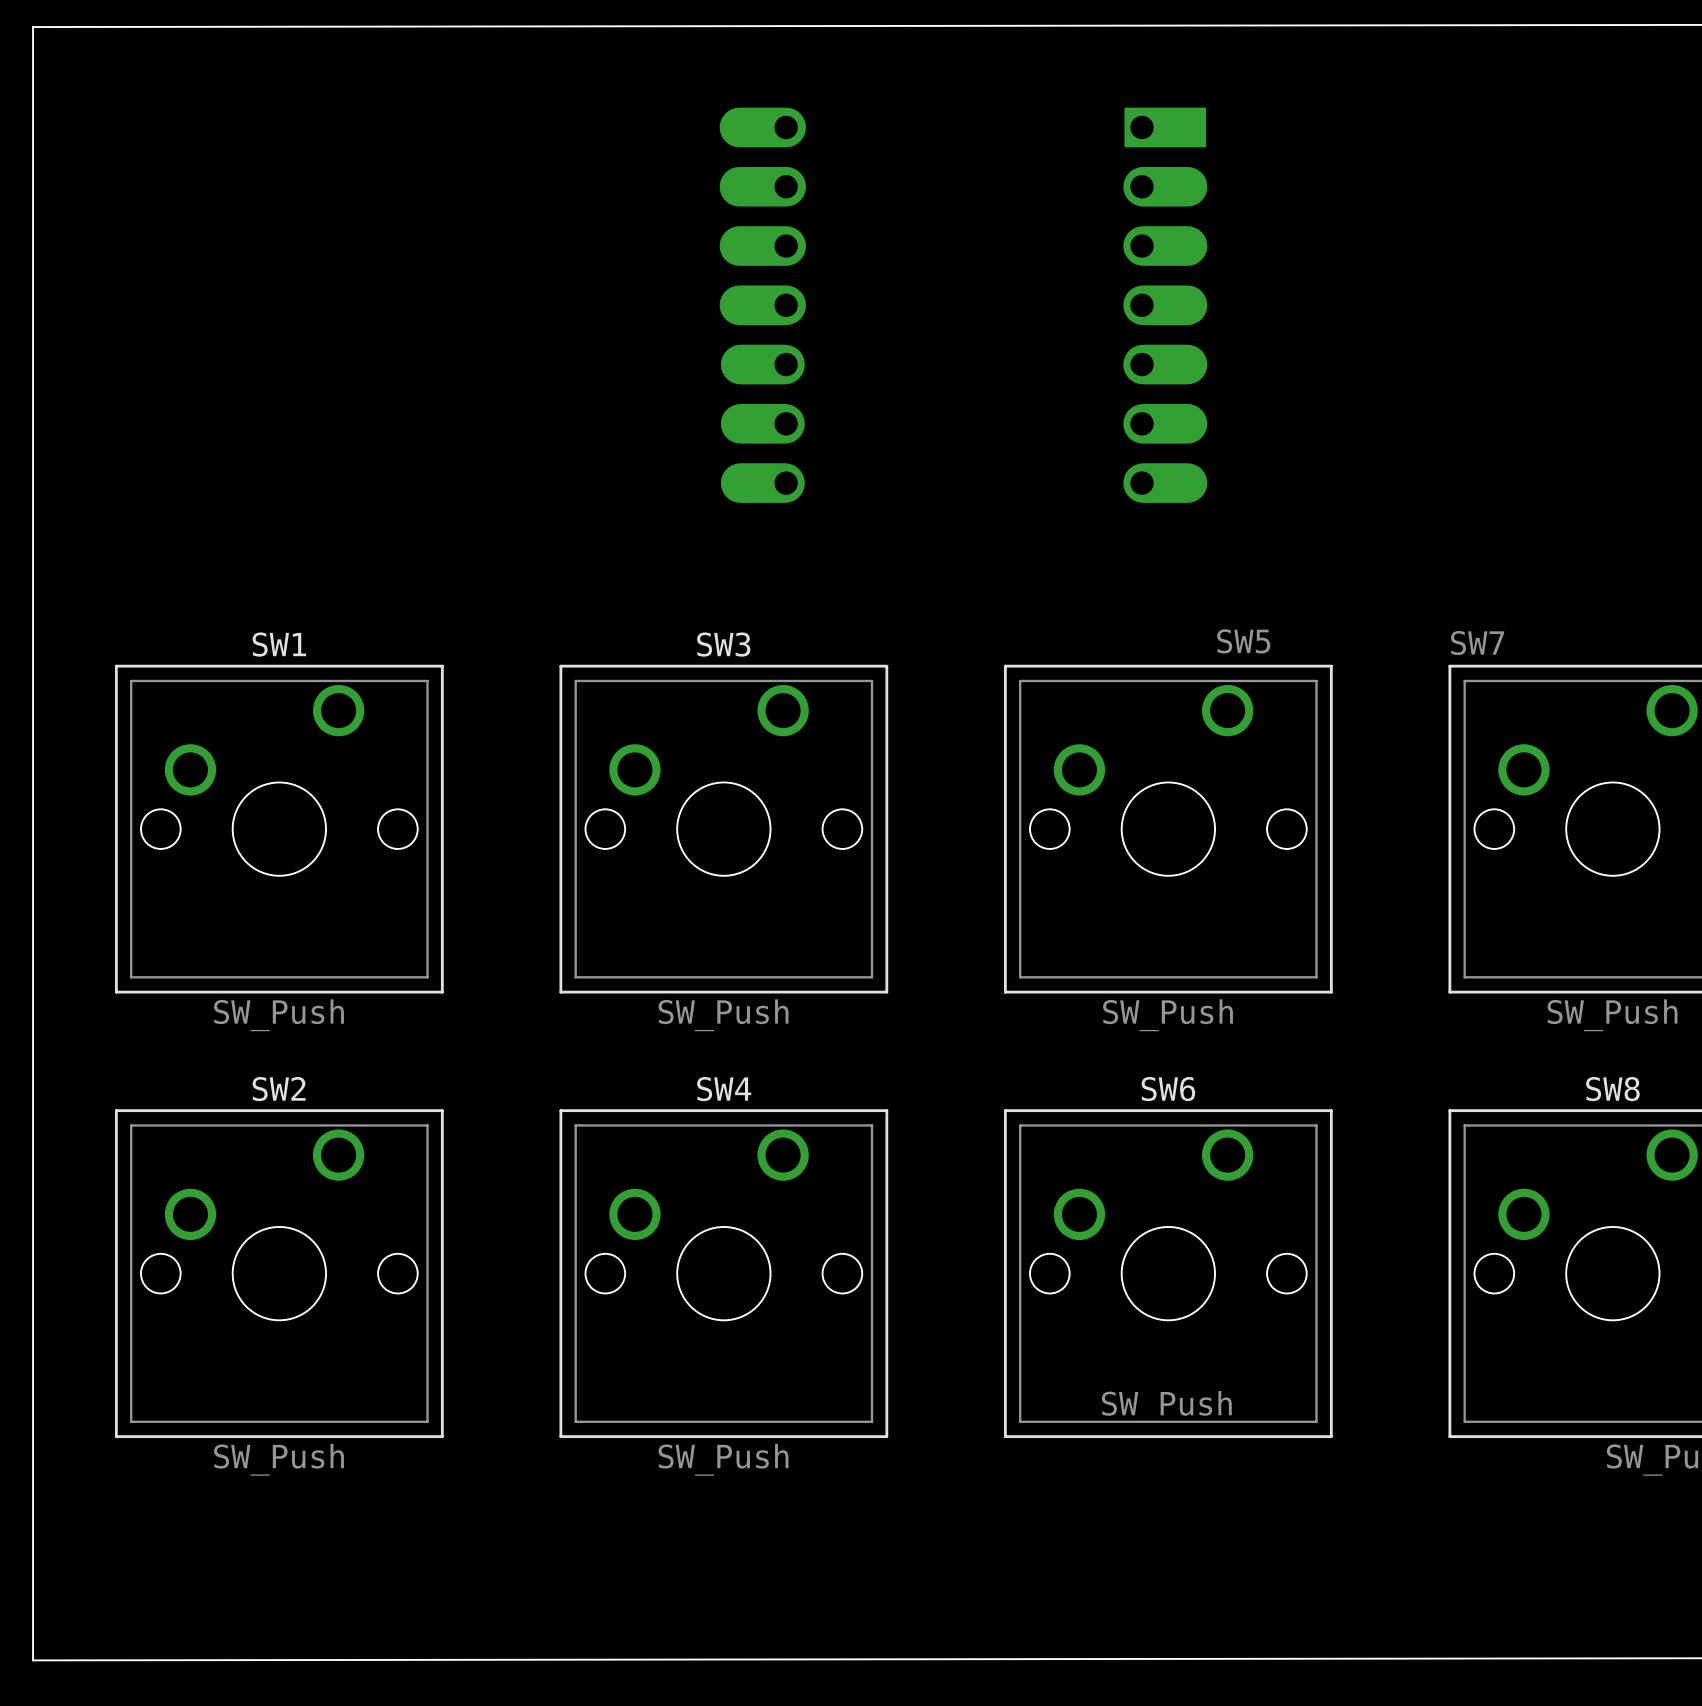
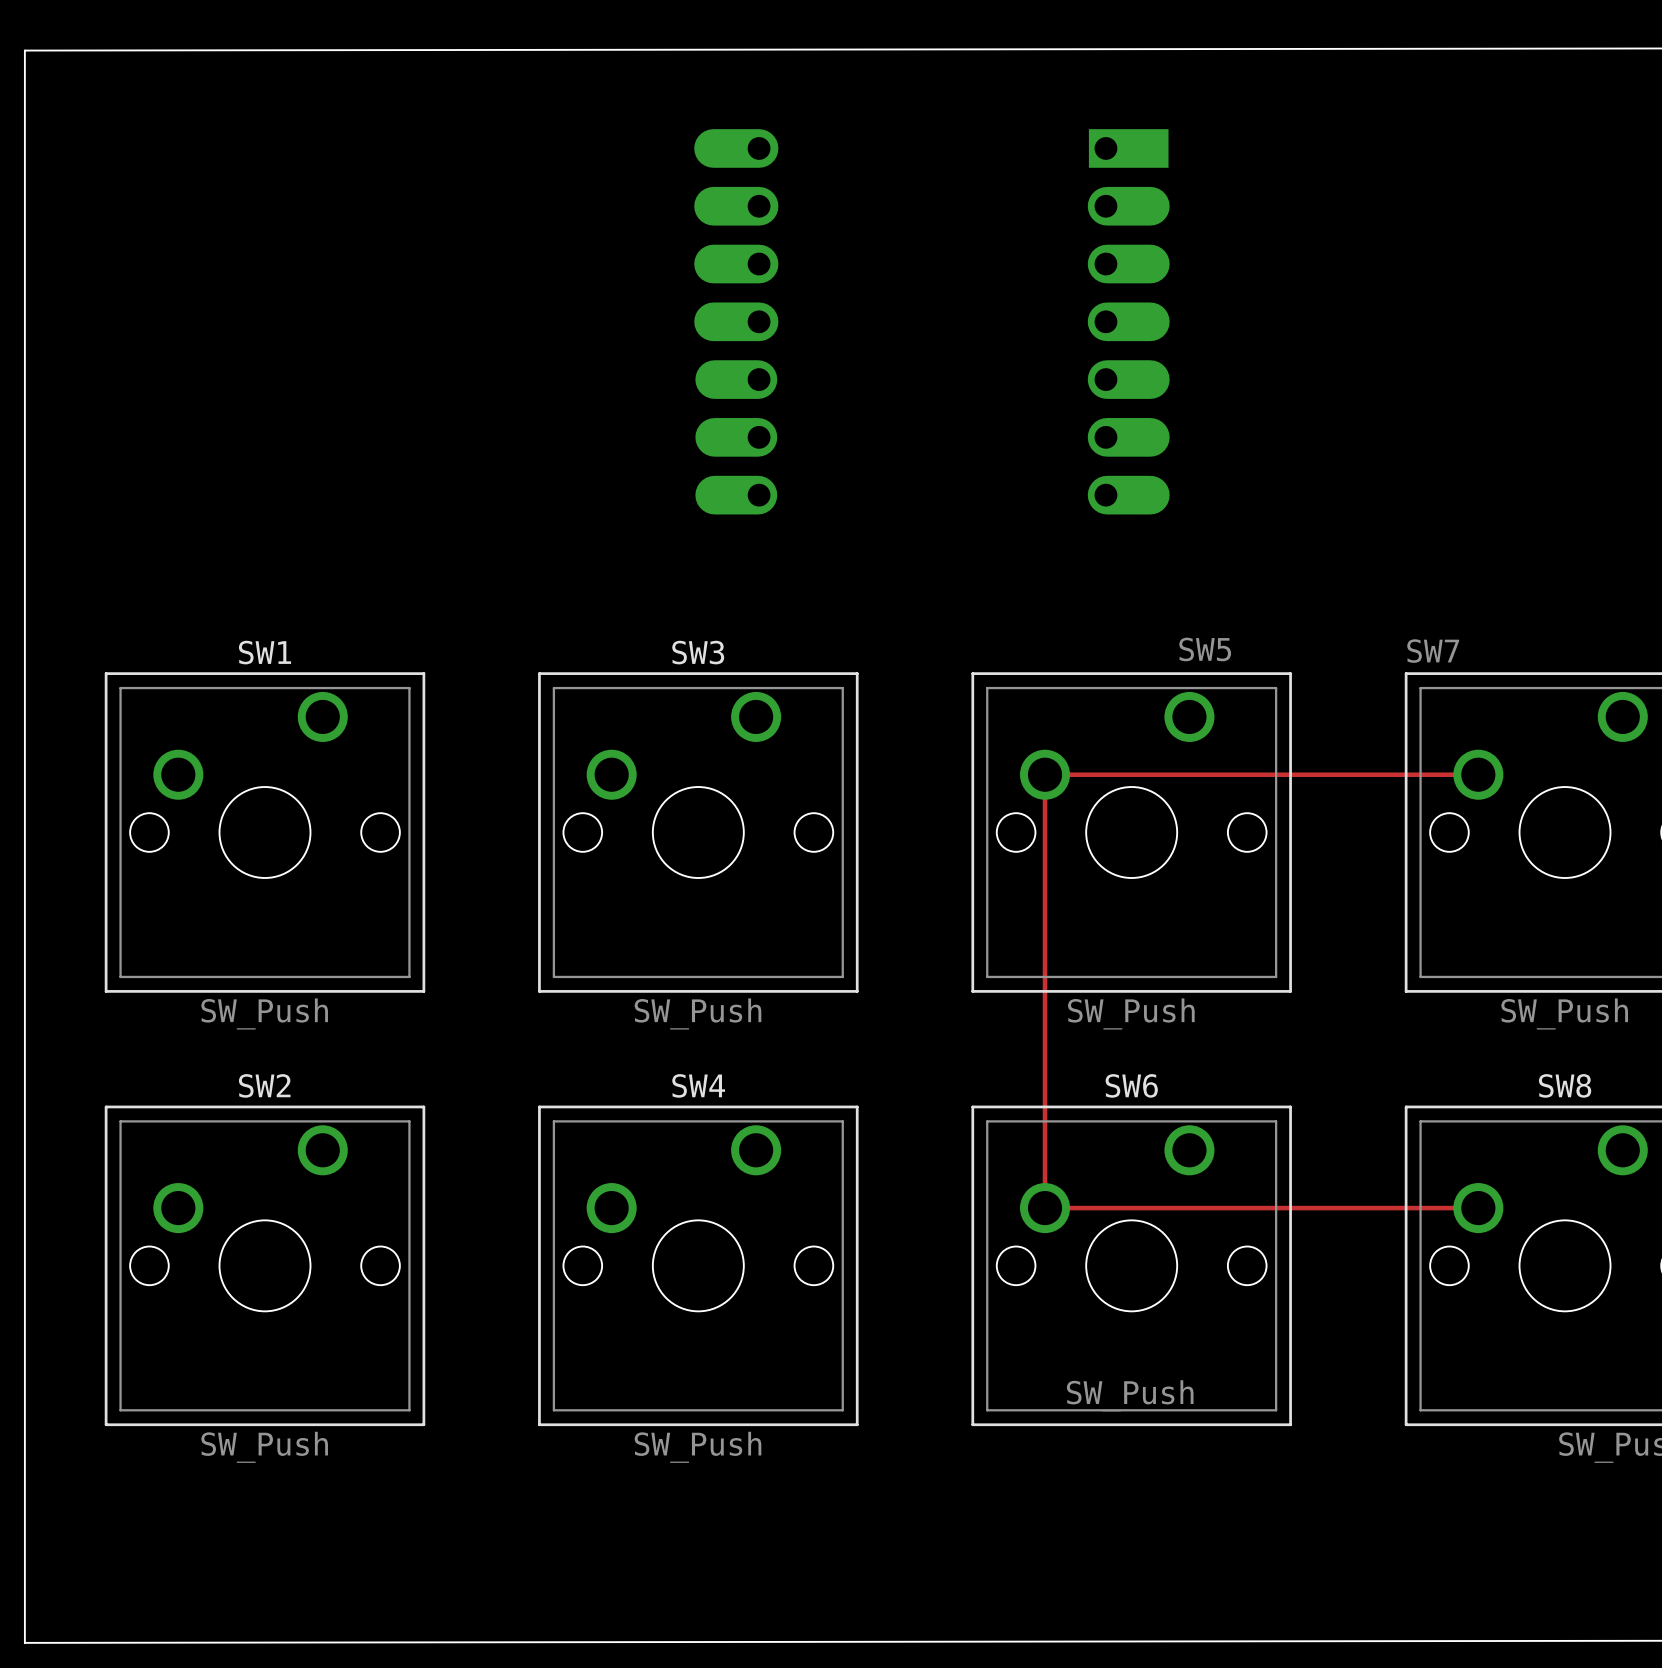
top track: none -> (1478, 774) (1045, 774) (1045, 1208) (1478, 1208)

